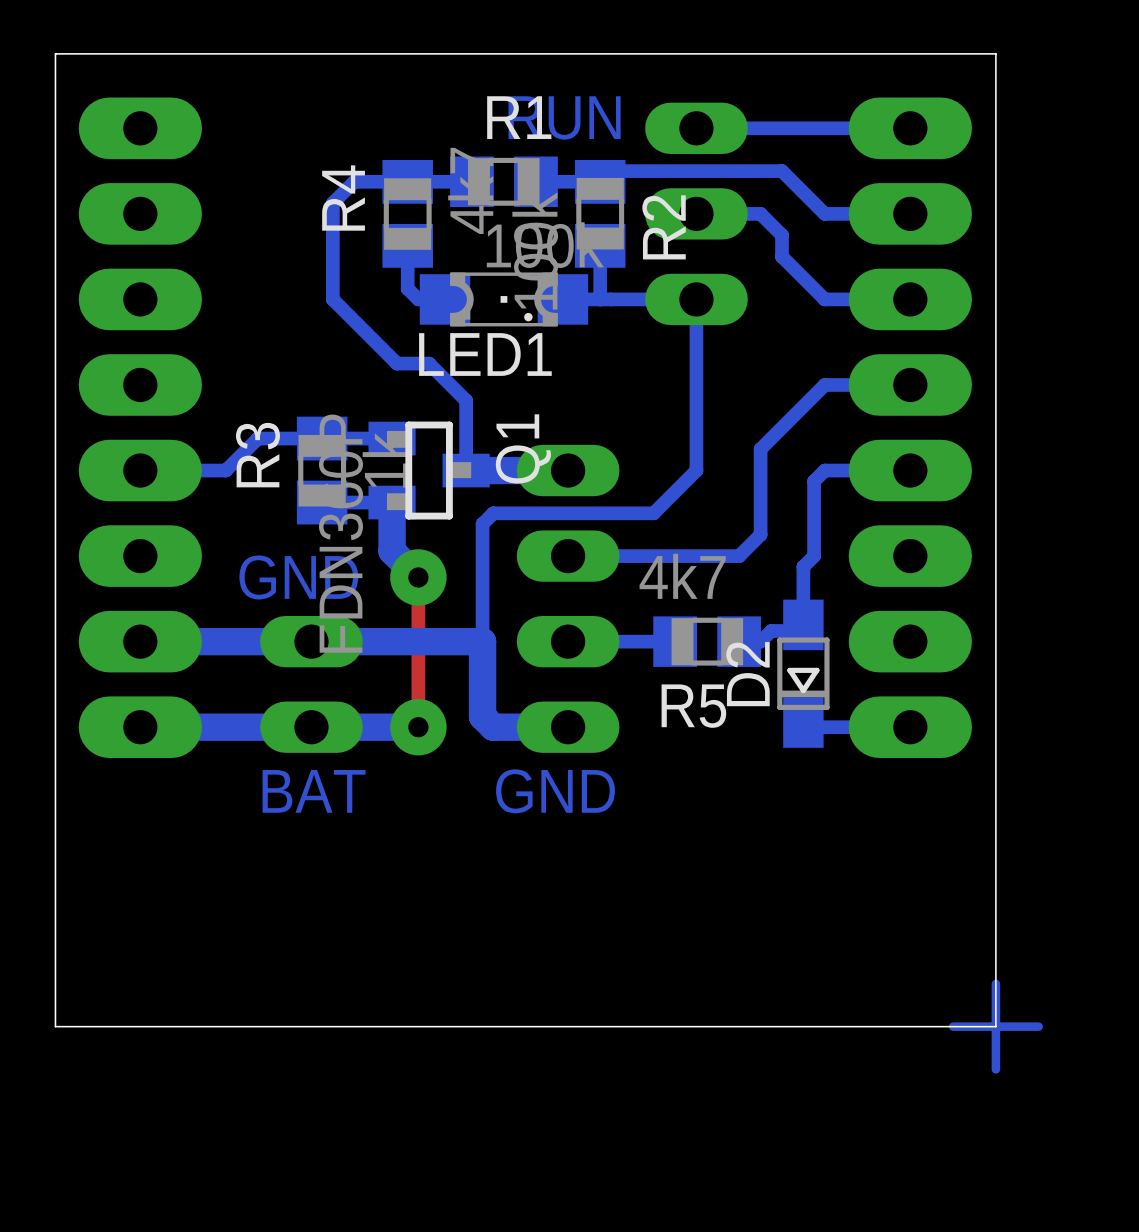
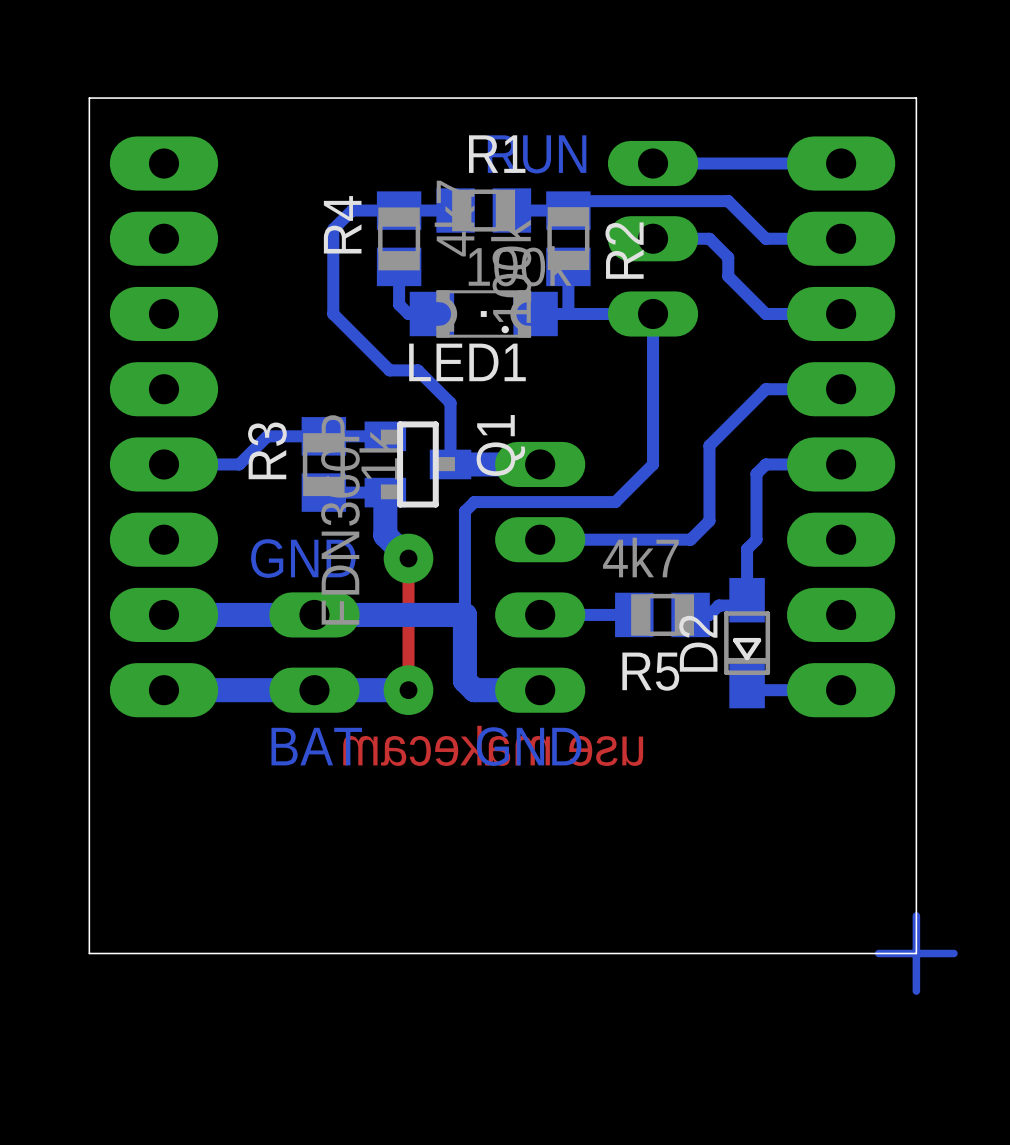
drawing: none -> [343, 725, 644, 766]

